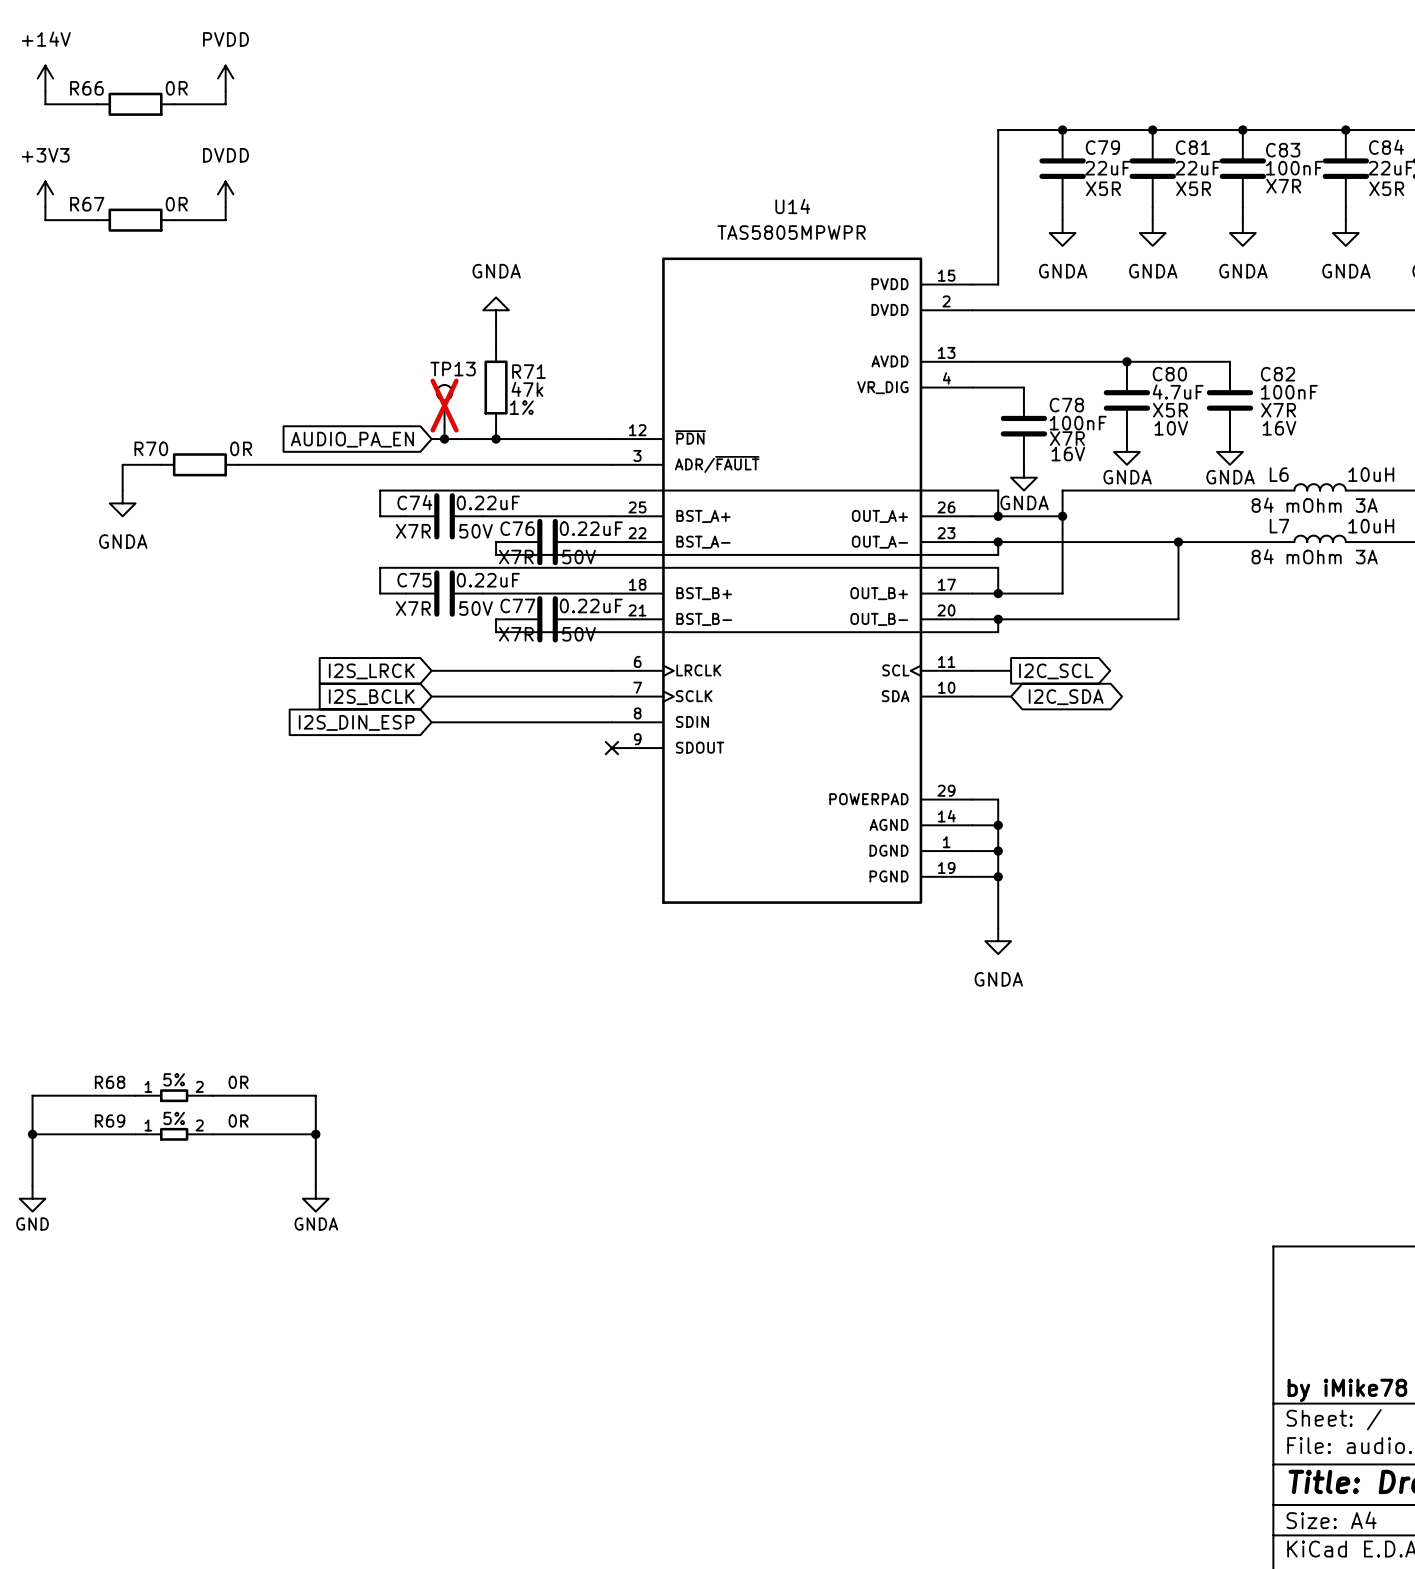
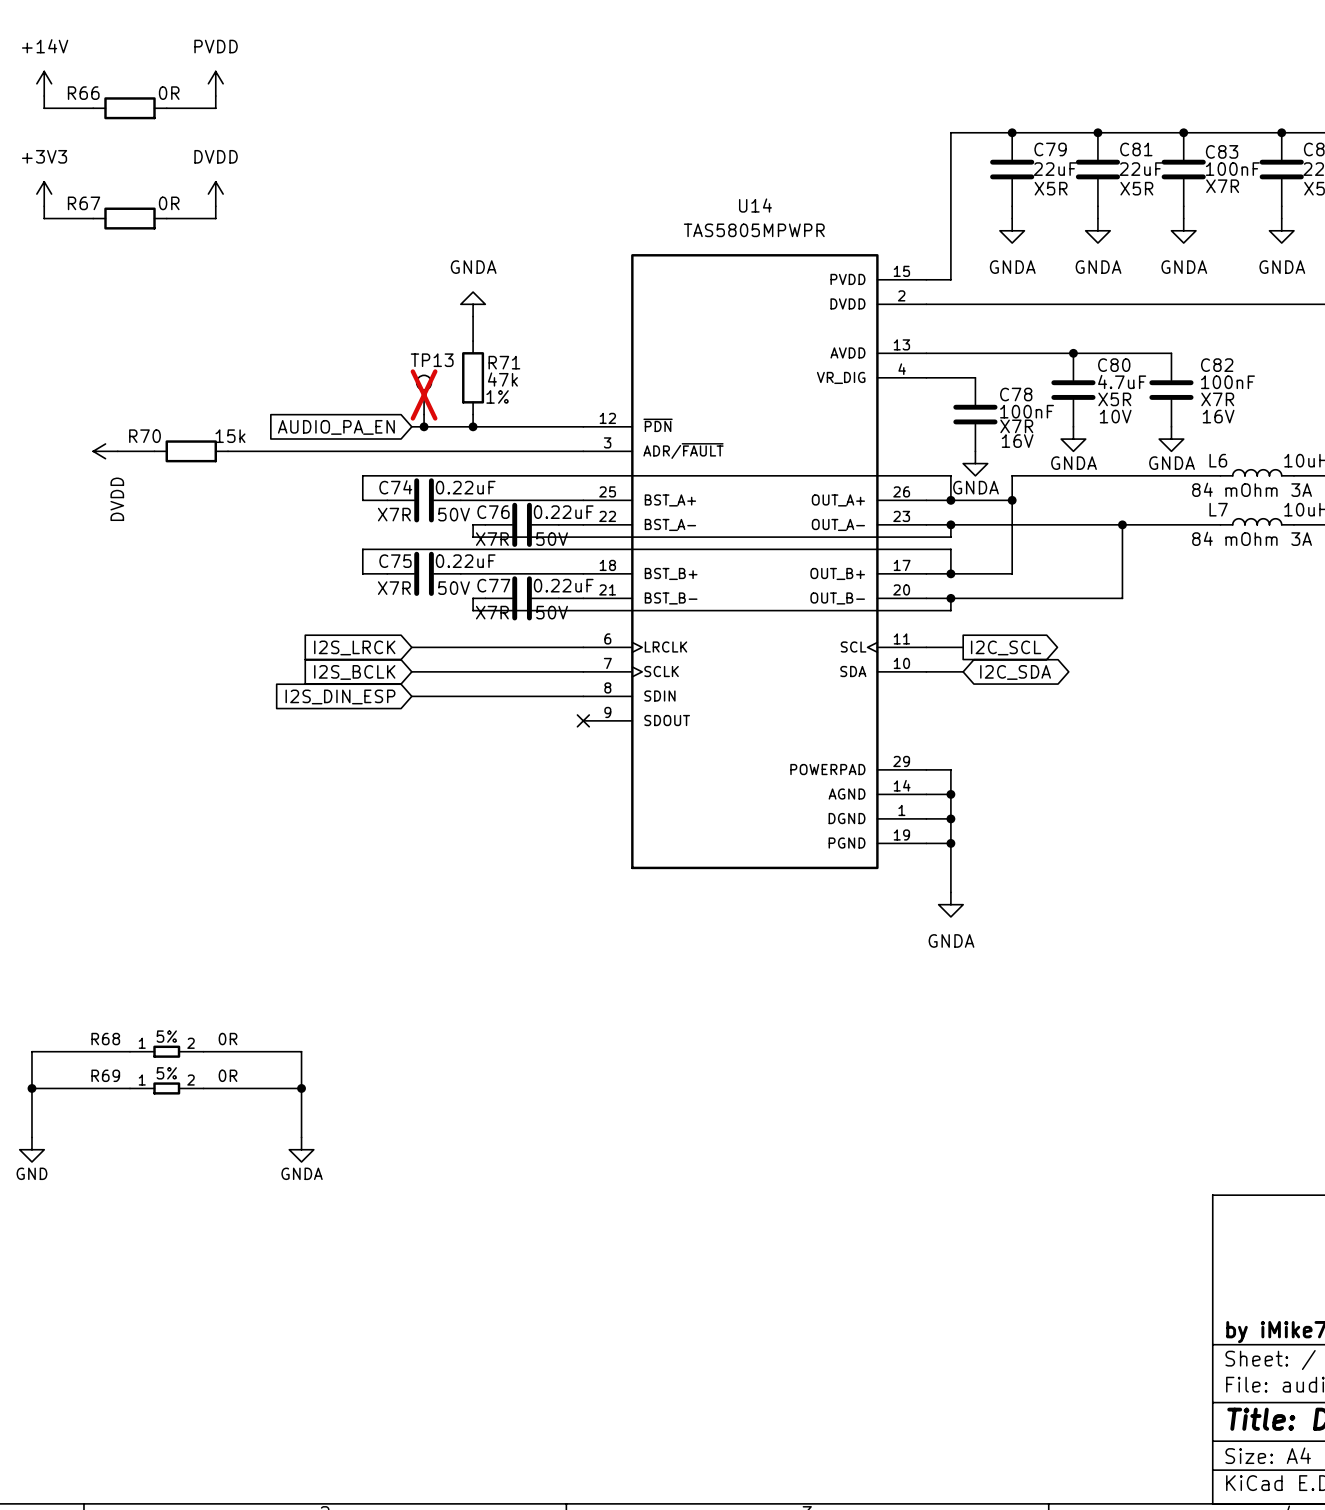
R70 value: 0R (241, 448) -> 15k (230, 436)
power symbol: none -> DVDD (105, 451)
wire: (122, 464) (122, 490) -> none
power symbol: GNDA (122, 503) -> none

